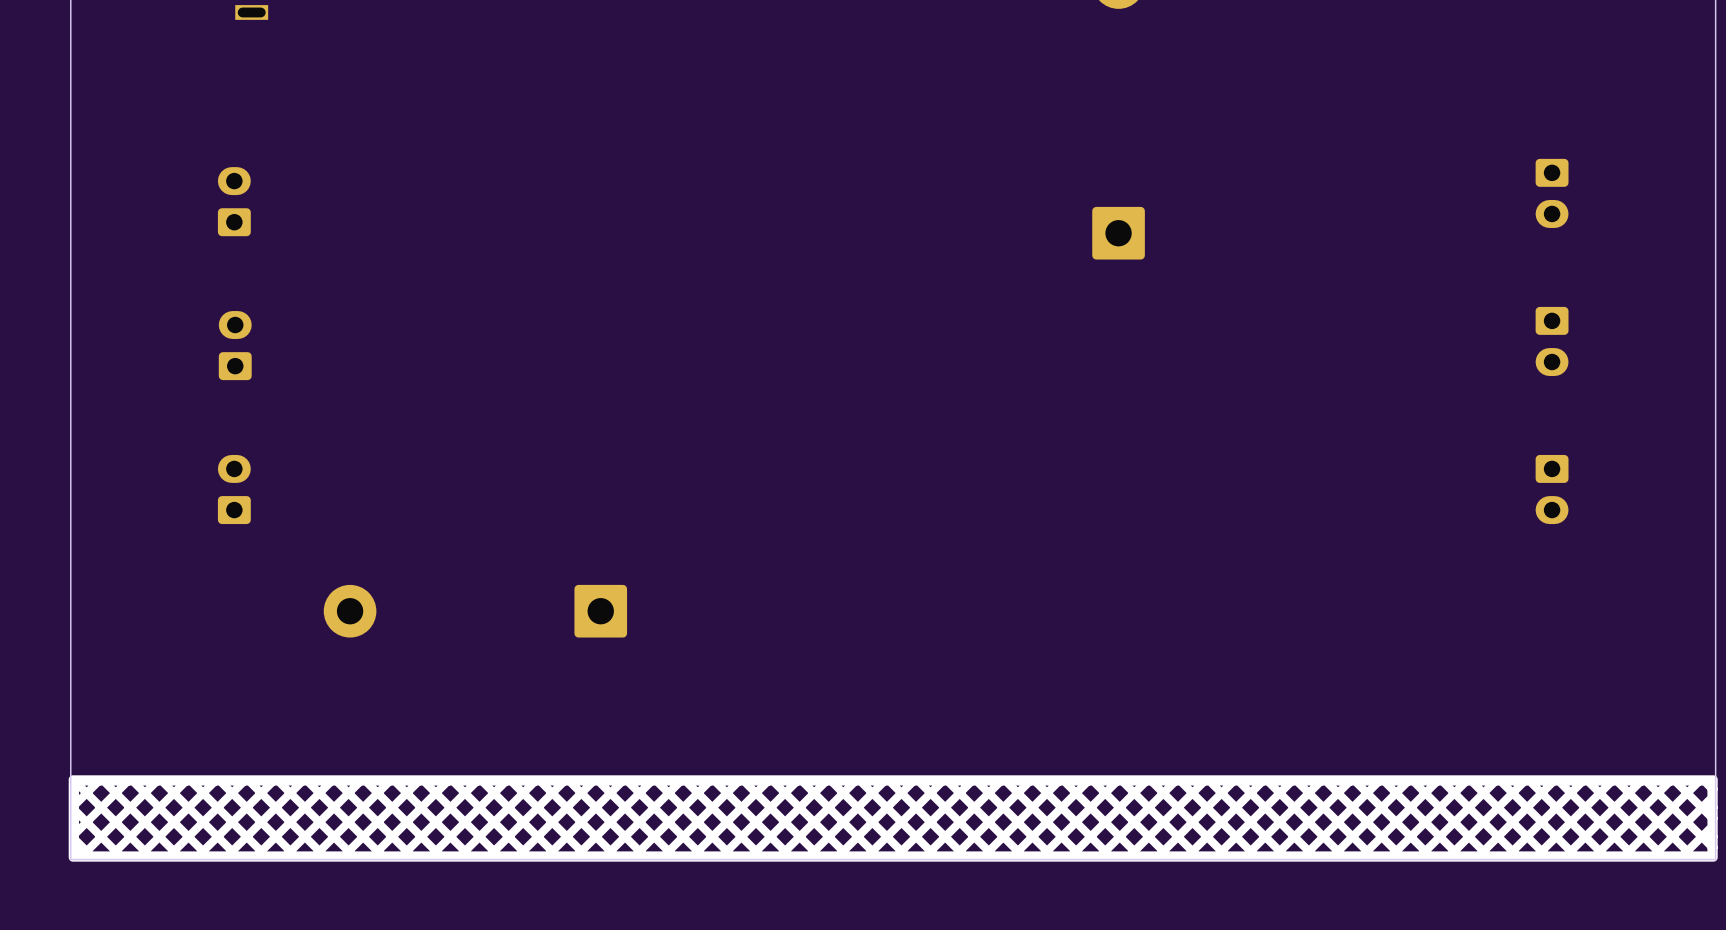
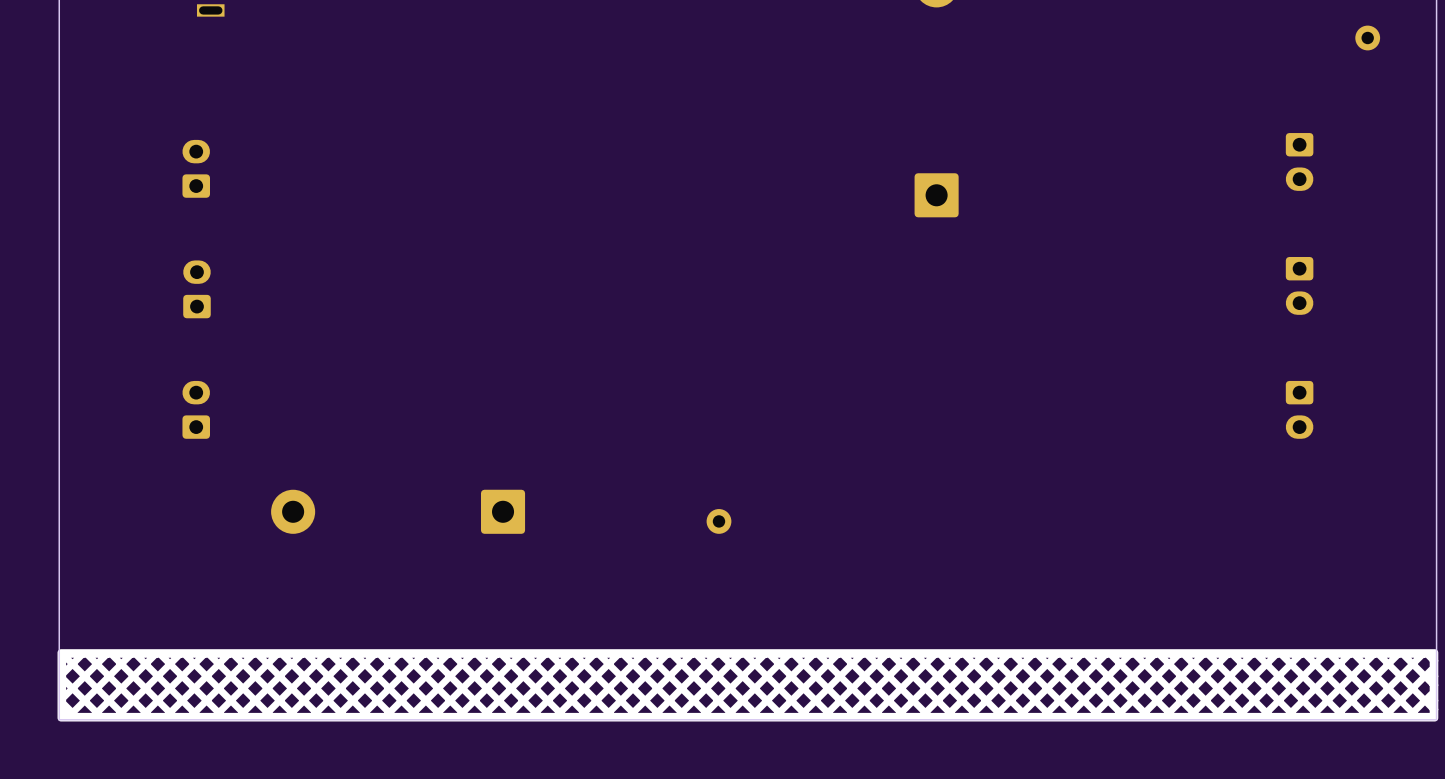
part: none -> (1367, 38)
part: none -> (718, 521)

